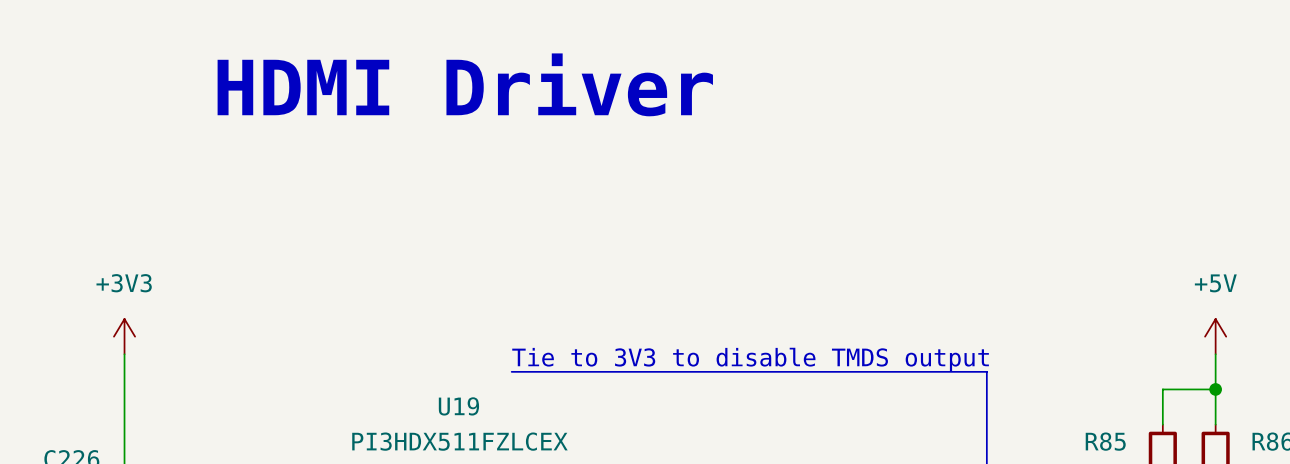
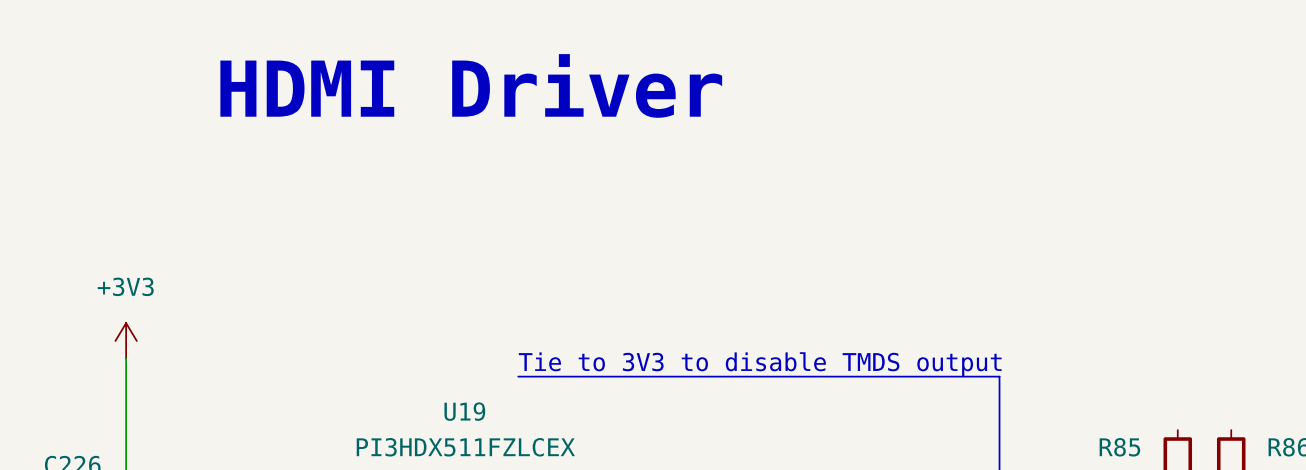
power symbol: +5V (1215, 336) -> none
wire: (1215, 354) (1215, 424) -> none
wire: (1215, 389) (1162, 389) (1162, 424) -> none
junction: (1215, 389) -> none

